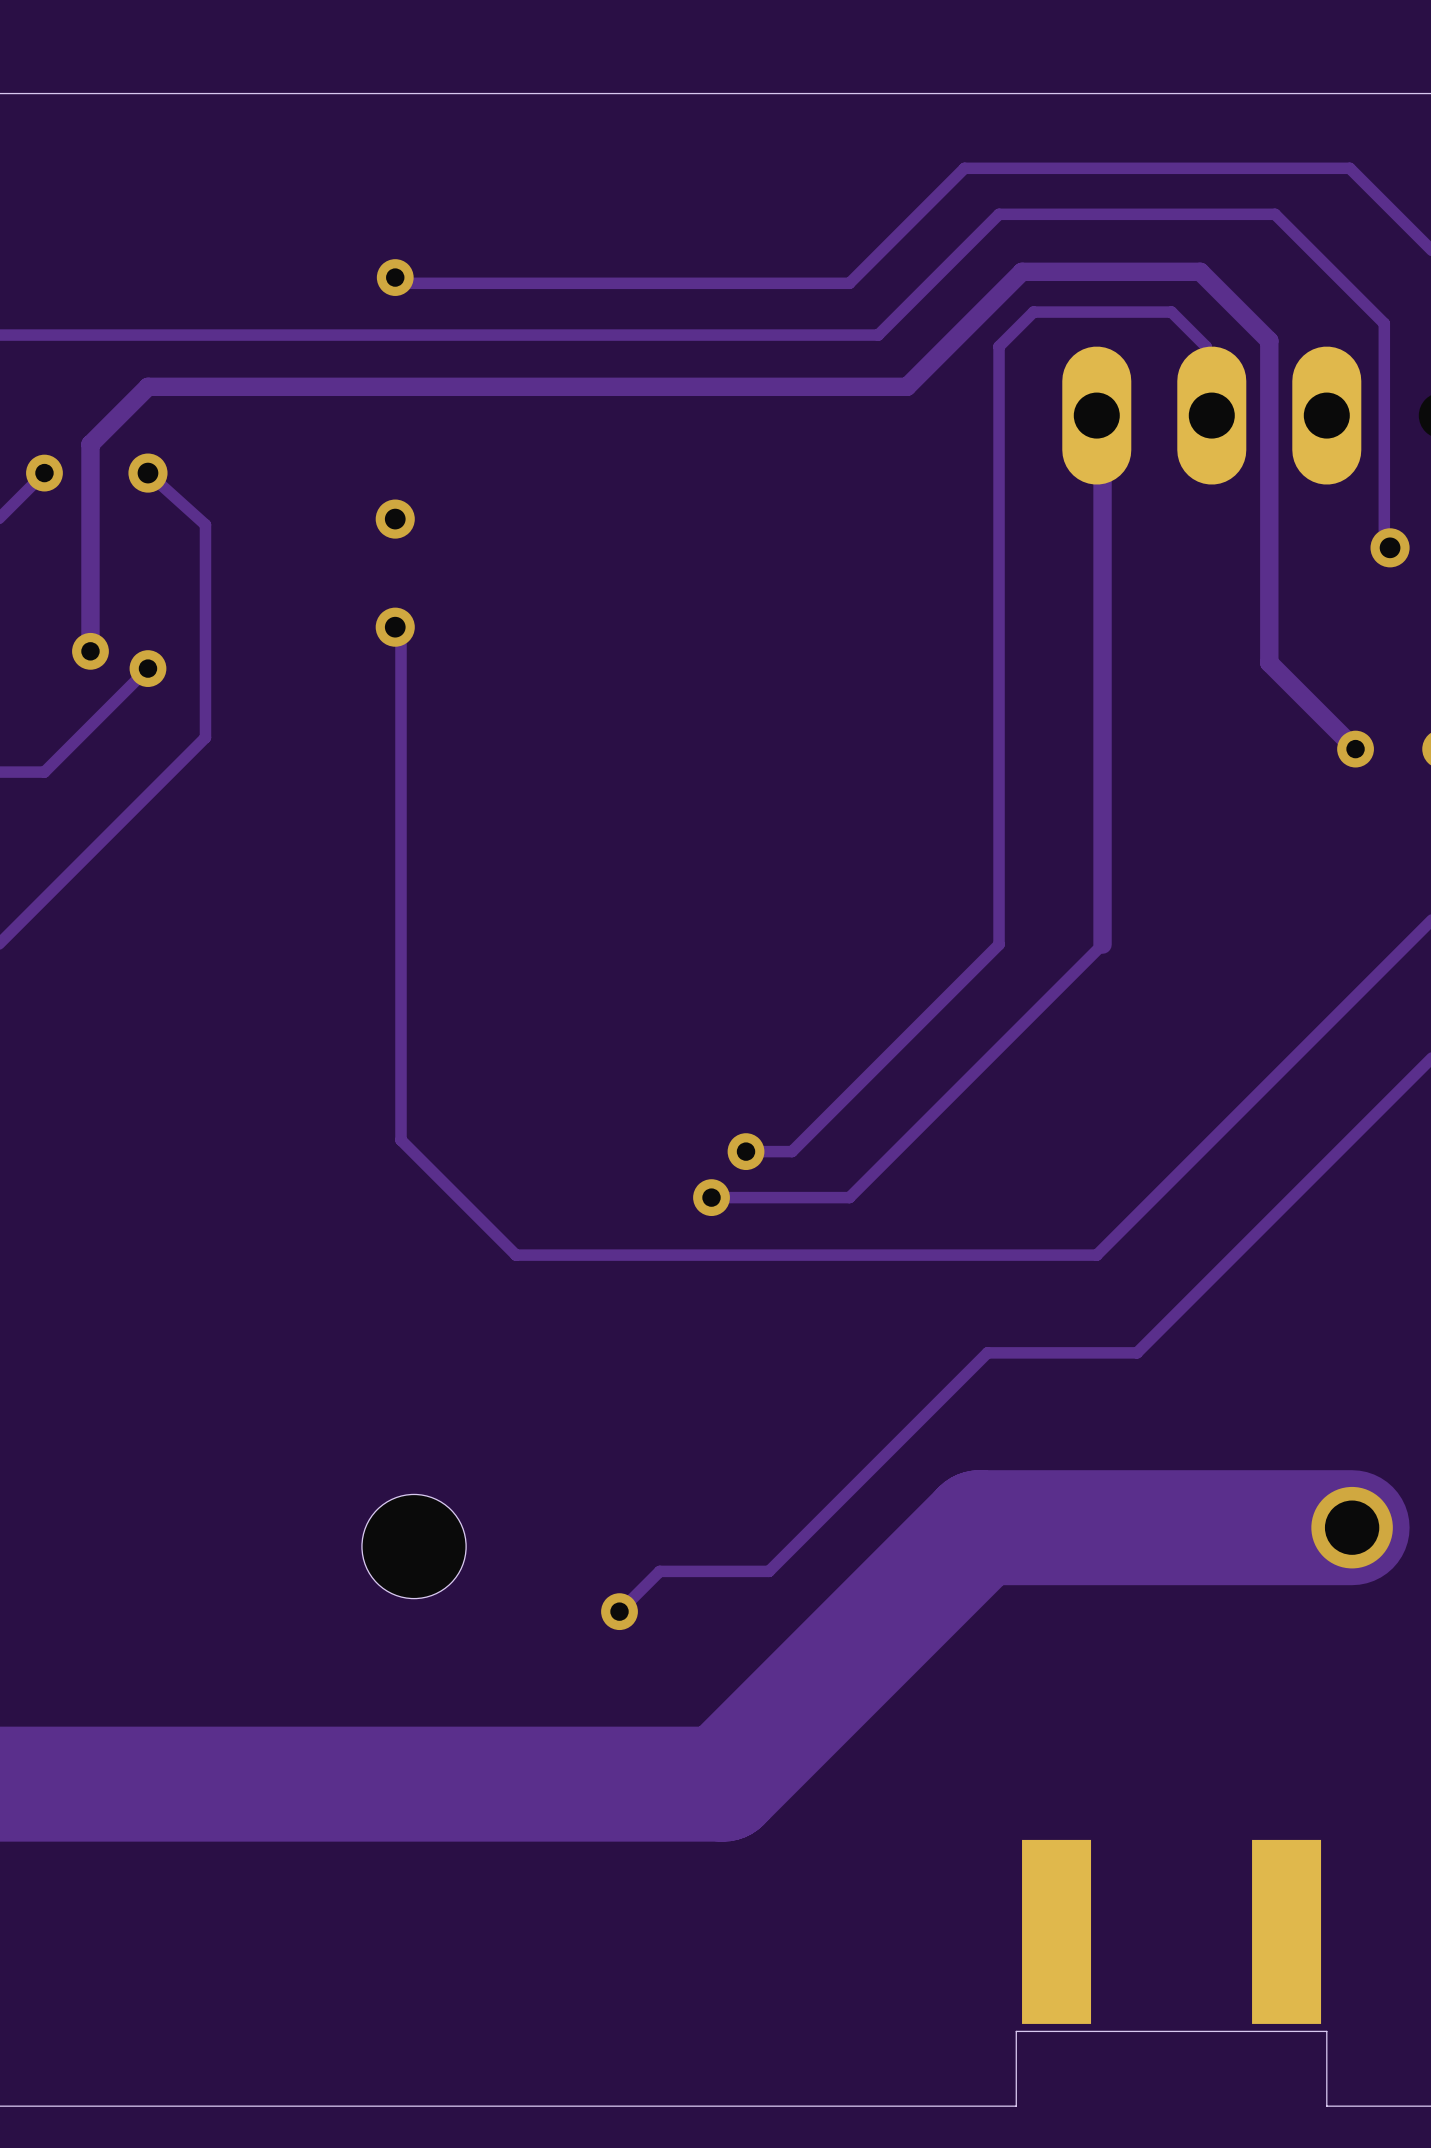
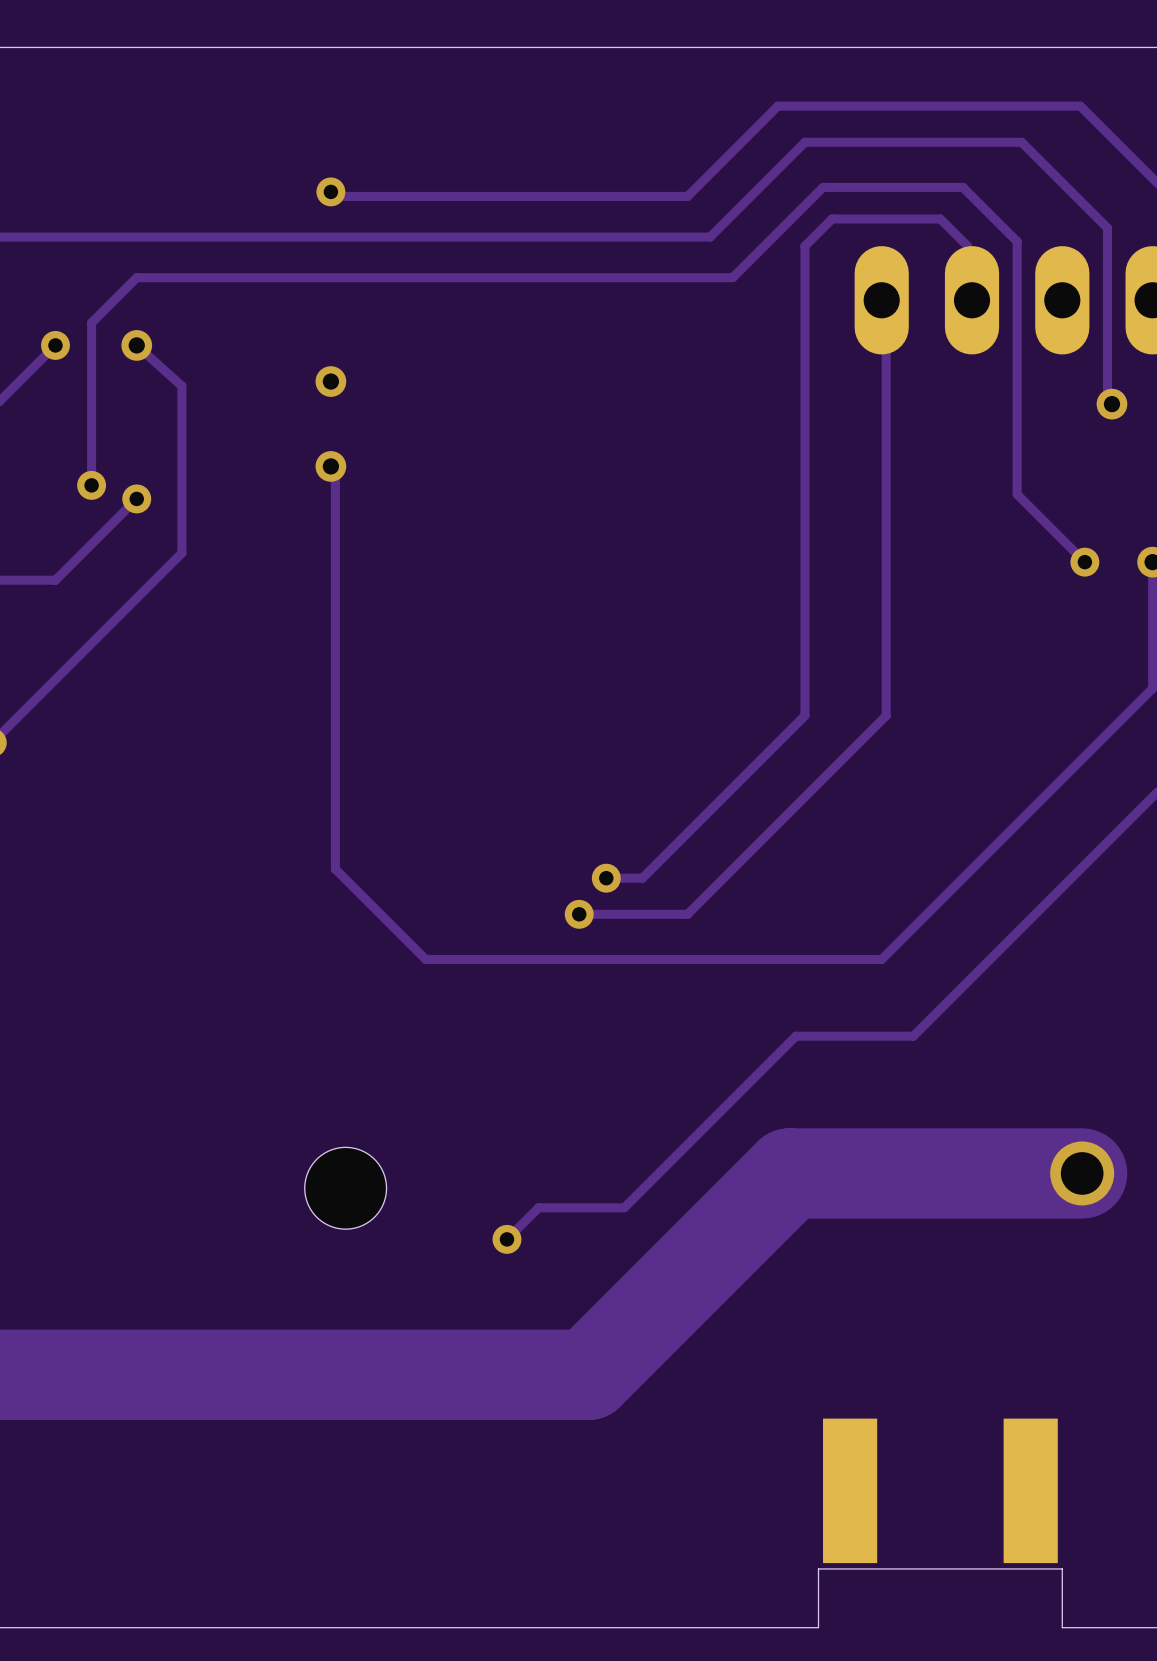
track width: thick (1102, 421) (1102, 944) -> thin (886, 304) (886, 715)
track width: thick (90, 651) (90, 444) (147, 386) (907, 386) (1022, 271) (1200, 271) (1269, 340) (1269, 662) (1355, 749) -> thin (91, 485) (91, 322) (136, 277) (732, 277) (823, 187) (962, 187) (1017, 241) (1017, 494) (1084, 562)

